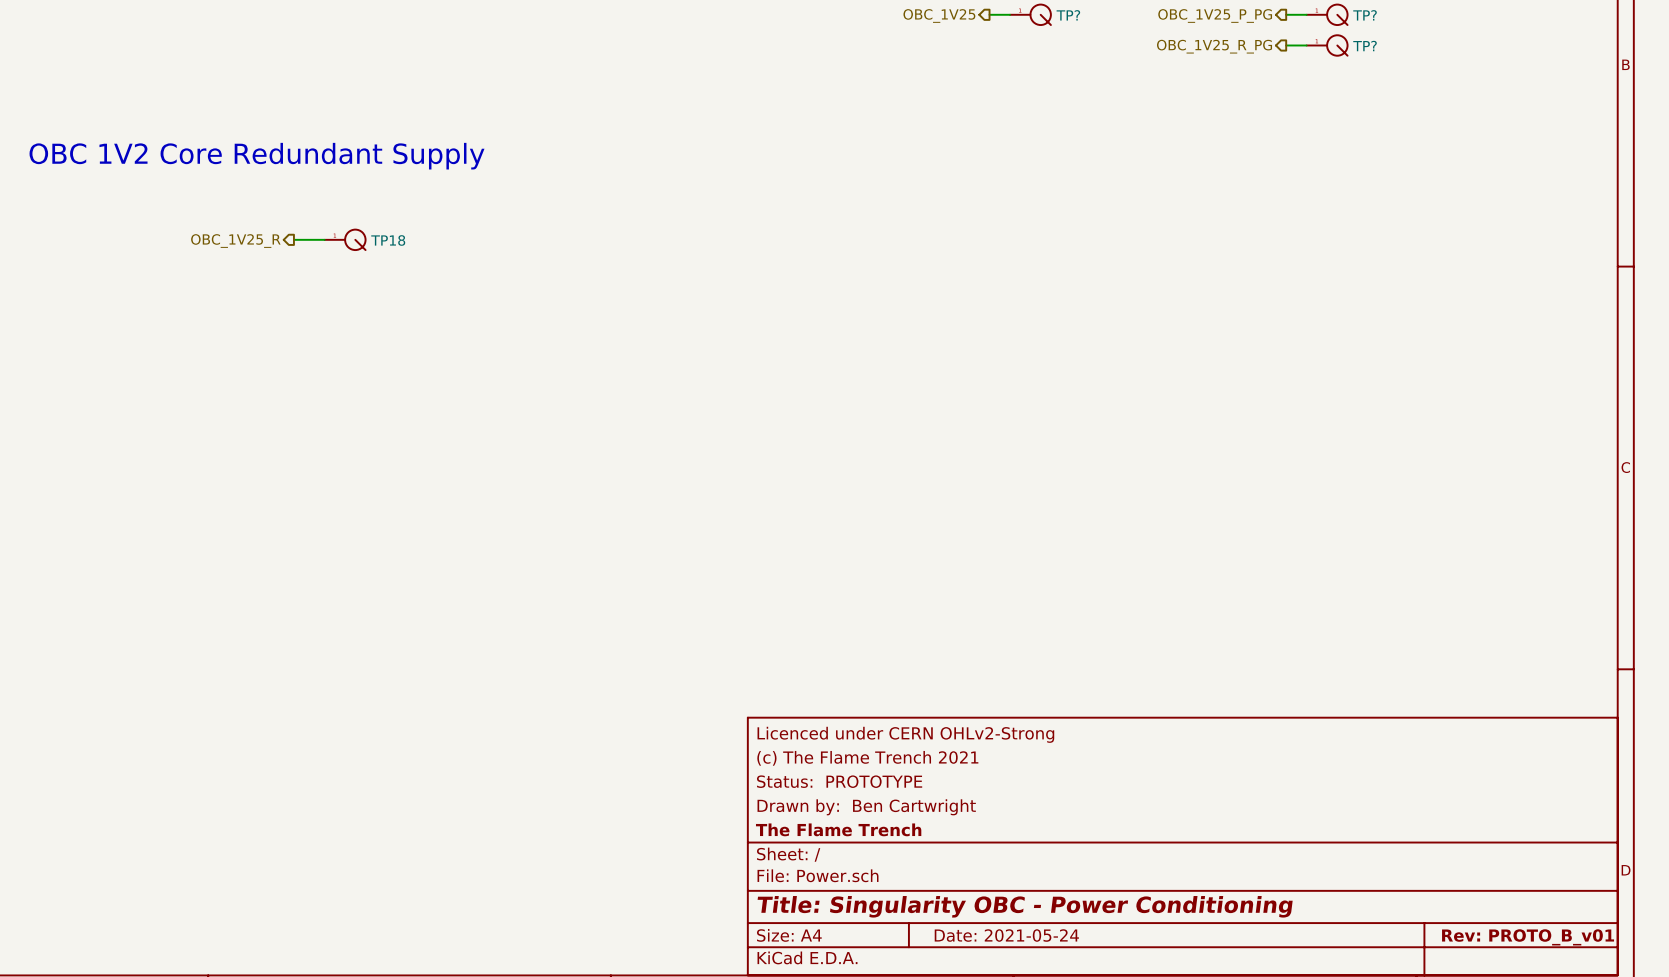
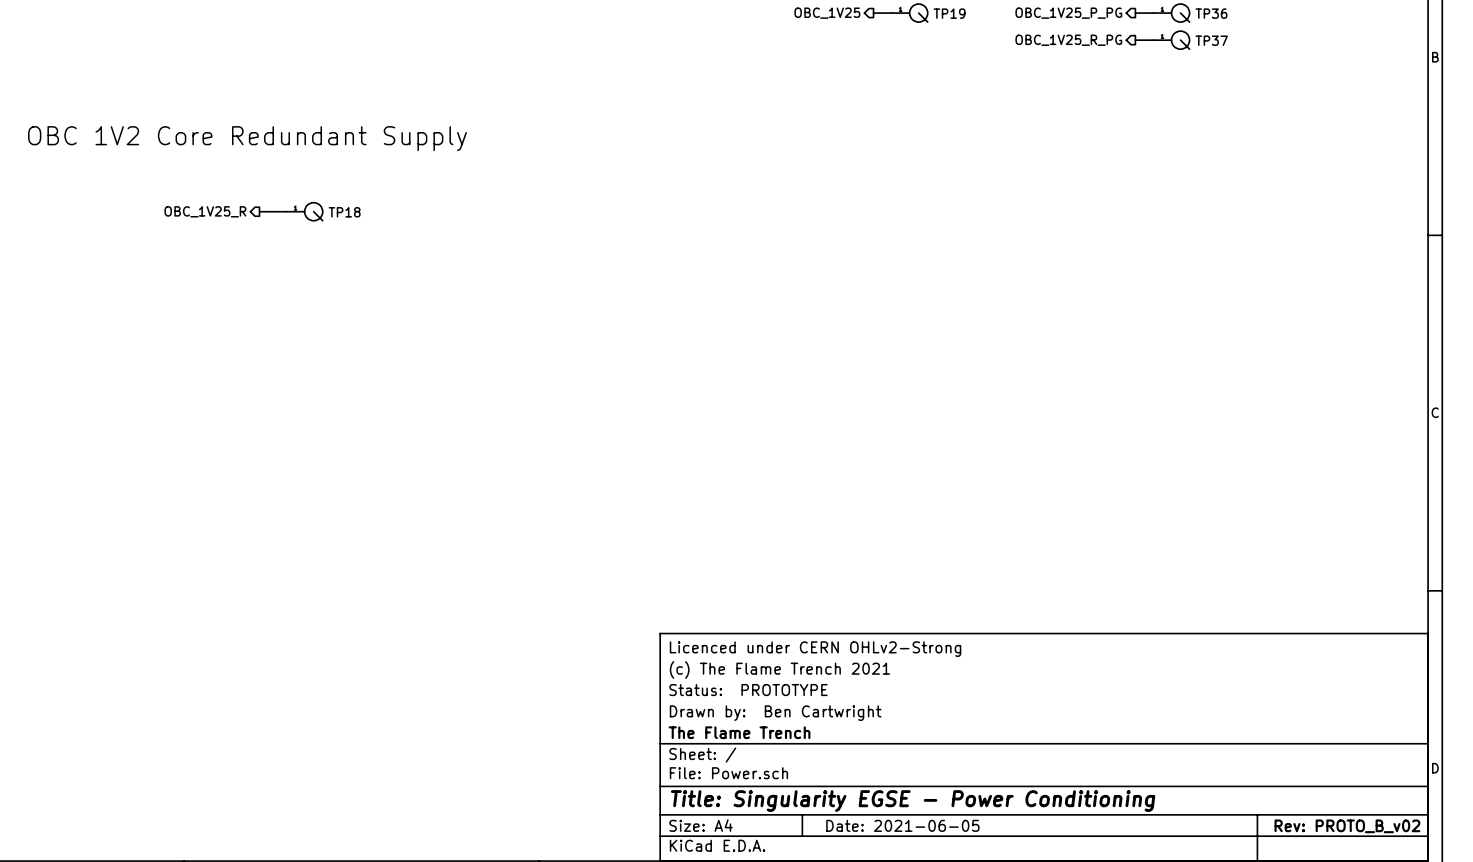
TP? name: TP? (1068, 15) -> TP19 (949, 13)
TP? name: TP? (1365, 15) -> TP36 (1211, 13)
TP? name: TP? (1365, 46) -> TP37 (1211, 40)
title block: Title: Singularity OBC - Power Conditioning (1025, 906) -> Title: Singularity EGSE - Power Conditioning (913, 801)
title block: Date: 2021-05-24 (1006, 935) -> Date: 2021-06-05 (902, 825)
title block: Rev: PROTO_B_v01 (1528, 937) -> Rev: PROTO_B_v02 (1347, 826)

